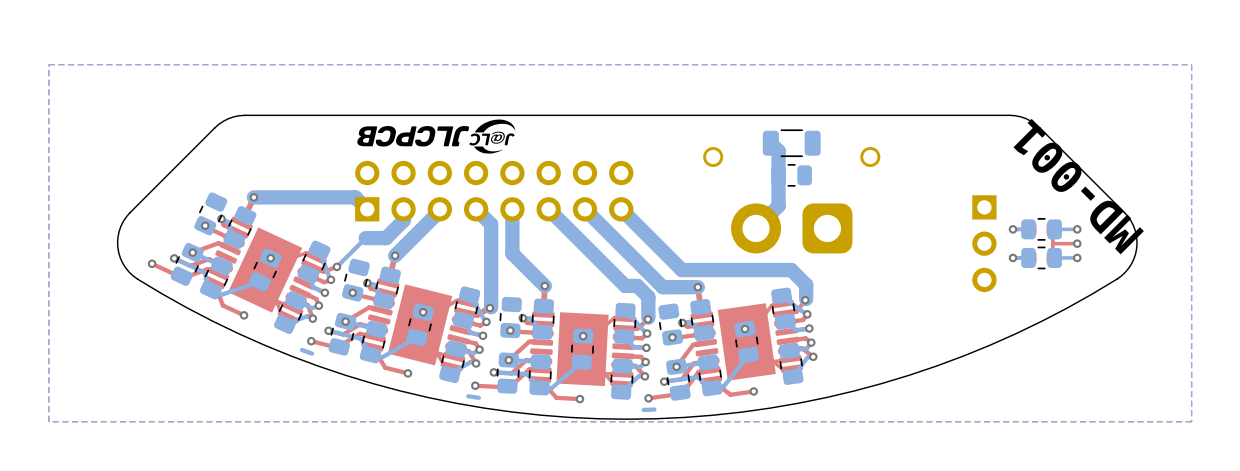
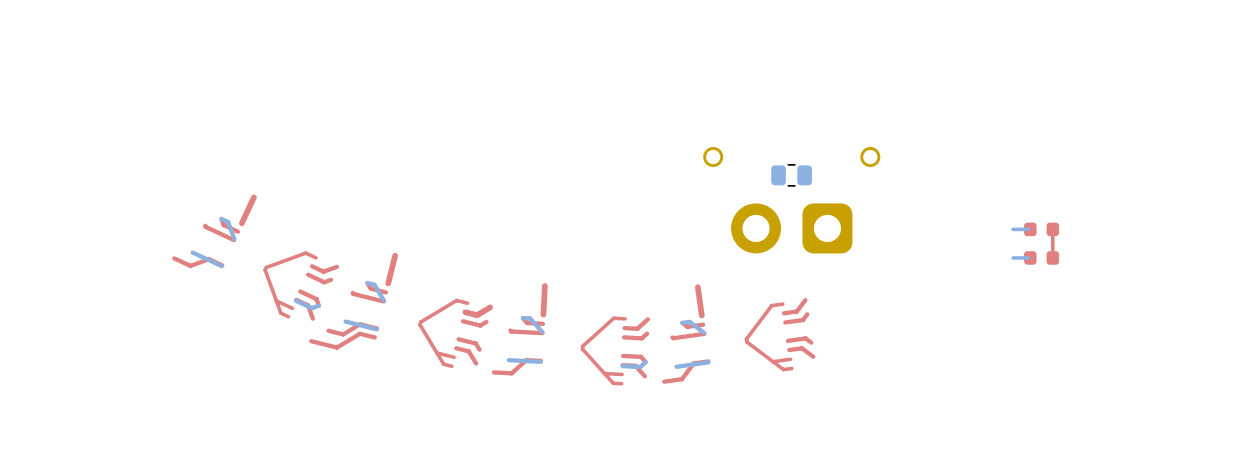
bottom zone outline: (1191, 64) (48, 64) (48, 421) (1191, 421) (1191, 64) -> none
board edge: (1009, 115) (239, 115) (228, 118) (214, 127) (130, 212) (119, 231) (117, 247) (122, 263) (133, 276) (212, 321) (291, 356) (345, 375) (400, 390) (484, 408) (541, 415) (598, 418) (684, 417) (770, 408) (826, 397) (881, 383) (963, 356) (1016, 333) (1067, 308) (1116, 279) (1128, 268) (1134, 258) (1137, 242) (1135, 231) (1128, 216) (1035, 124) (1025, 118) (1009, 115) -> none
drawing: [357, 119, 516, 154] -> none
bottom track: (770, 143) (778, 150) (778, 205) (756, 228) -> none
part: (791, 143) -> none
text: MD-001 (1078, 186) -> none
part: (494, 191) -> none
bottom track: (253, 197) (355, 197) (367, 209) -> none
via: (253, 197) -> none
bottom track: (403, 209) (403, 220) (386, 238) (365, 238) (336, 266) -> none
bottom track: (439, 209) (395, 255) -> none
bottom track: (476, 209) (491, 224) (491, 307) -> none
bottom track: (512, 209) (512, 253) (544, 286) -> none
bottom track: (548, 209) (625, 285) (637, 285) (648, 296) (648, 317) -> none
bottom track: (584, 209) (662, 287) (697, 287) -> none
bottom track: (621, 209) (681, 270) (791, 270) (806, 284) (806, 299) -> none
part: (210, 213) -> none
via: (221, 218) -> none
via: (205, 225) -> none
part: (239, 227) -> none
via: (1012, 229) -> none
part: (1041, 229) -> none
bottom track: (1077, 229) (1054, 229) -> none
via: (1077, 229) -> none
part: (984, 243) -> none
top track: (1077, 243) (1052, 243) -> none
via: (1077, 243) -> none
top track: (230, 248) (218, 243) (192, 252) -> none
bottom track: (319, 250) (330, 279) -> none
via: (192, 252) -> none
via: (395, 255) -> none
via: (1012, 257) -> none
part: (1041, 257) -> none
bottom track: (1077, 257) (1054, 257) -> none
via: (1077, 257) -> none
bottom track: (174, 258) (204, 272) (210, 289) (221, 294) (259, 281) -> none
via: (174, 258) -> none
via: (270, 258) -> none
part: (314, 262) -> none
top track: (152, 263) (182, 278) (208, 269) (218, 273) -> none
via: (152, 263) -> none
part: (187, 264) -> none
via: (336, 266) -> none
part: (265, 270) -> none
part: (265, 270) -> none
bottom track: (308, 273) (313, 287) (324, 292) -> none
part: (216, 278) -> none
via: (330, 279) -> none
part: (355, 280) -> none
top track: (214, 282) (222, 305) (244, 315) -> none
via: (367, 283) -> none
via: (544, 286) -> none
part: (387, 287) -> none
via: (697, 287) -> none
via: (324, 292) -> none
via: (352, 292) -> none
bottom track: (469, 295) (486, 321) -> none
bottom track: (781, 295) (807, 314) -> none
via: (805, 300) -> none
via: (318, 305) -> none
part: (466, 307) -> none
via: (489, 308) -> none
part: (783, 308) -> none
top track: (381, 310) (369, 307) (345, 321) -> none
bottom track: (625, 310) (647, 333) -> none
part: (290, 312) -> none
via: (423, 312) -> none
via: (807, 314) -> none
via: (244, 315) -> none
part: (511, 317) -> none
bottom track: (312, 318) (307, 316) (284, 324) -> none
via: (312, 318) -> none
via: (522, 318) -> none
part: (543, 319) -> none
via: (647, 319) -> none
bottom track: (463, 320) (470, 332) (483, 335) -> none
part: (702, 320) -> none
via: (345, 321) -> none
via: (486, 321) -> none
bottom track: (785, 321) (796, 330) (809, 328) -> none
via: (682, 322) -> none
part: (624, 323) -> none
part: (420, 324) -> none
part: (420, 324) -> none
part: (670, 324) -> none
via: (809, 328) -> none
via: (745, 329) -> none
bottom track: (328, 330) (360, 338) (370, 354) (381, 357) (416, 337) -> none
via: (328, 330) -> none
via: (510, 330) -> none
via: (647, 333) -> none
part: (342, 334) -> none
via: (483, 335) -> none
via: (583, 336) -> none
bottom track: (624, 336) (633, 347) (646, 347) -> none
via: (672, 337) -> none
via: (311, 341) -> none
part: (746, 341) -> none
part: (746, 341) -> none
part: (373, 342) -> none
top track: (541, 342) (529, 341) (508, 360) -> none
bottom track: (811, 342) (806, 348) (789, 350) -> none
via: (811, 342) -> none
top track: (705, 343) (693, 344) (676, 366) -> none
top track: (372, 346) (385, 367) (407, 373) -> none
via: (646, 347) -> none
bottom track: (456, 349) (473, 353) (479, 349) -> none
via: (479, 349) -> none
part: (582, 349) -> none
part: (582, 349) -> none
bottom track: (302, 350) (312, 353) -> none
bottom track: (748, 354) (723, 386) (712, 388) (697, 377) (664, 381) -> none
bottom track: (813, 356) (807, 357) (793, 376) -> none
via: (813, 356) -> none
via: (508, 360) -> none
part: (452, 361) -> none
bottom track: (581, 362) (551, 388) (539, 387) (527, 374) (493, 372) -> none
via: (645, 362) -> none
bottom track: (476, 363) (470, 362) (449, 374) -> none
via: (476, 363) -> none
part: (791, 363) -> none
via: (676, 366) -> none
top track: (540, 370) (529, 369) (509, 387) (475, 385) -> none
top track: (709, 370) (698, 372) (682, 393) (648, 398) -> none
via: (493, 372) -> none
via: (407, 373) -> none
part: (508, 373) -> none
part: (540, 374) -> none
part: (710, 375) -> none
bottom track: (644, 376) (639, 376) (621, 392) -> none
via: (644, 376) -> none
top track: (539, 379) (556, 397) (579, 399) -> none
part: (621, 379) -> none
part: (678, 379) -> none
top track: (710, 379) (730, 394) (753, 391) -> none
via: (664, 381) -> none
via: (475, 385) -> none
via: (753, 391) -> none
bottom track: (468, 396) (478, 397) -> none
via: (648, 398) -> none
via: (579, 399) -> none
bottom track: (654, 409) (643, 409) -> none

